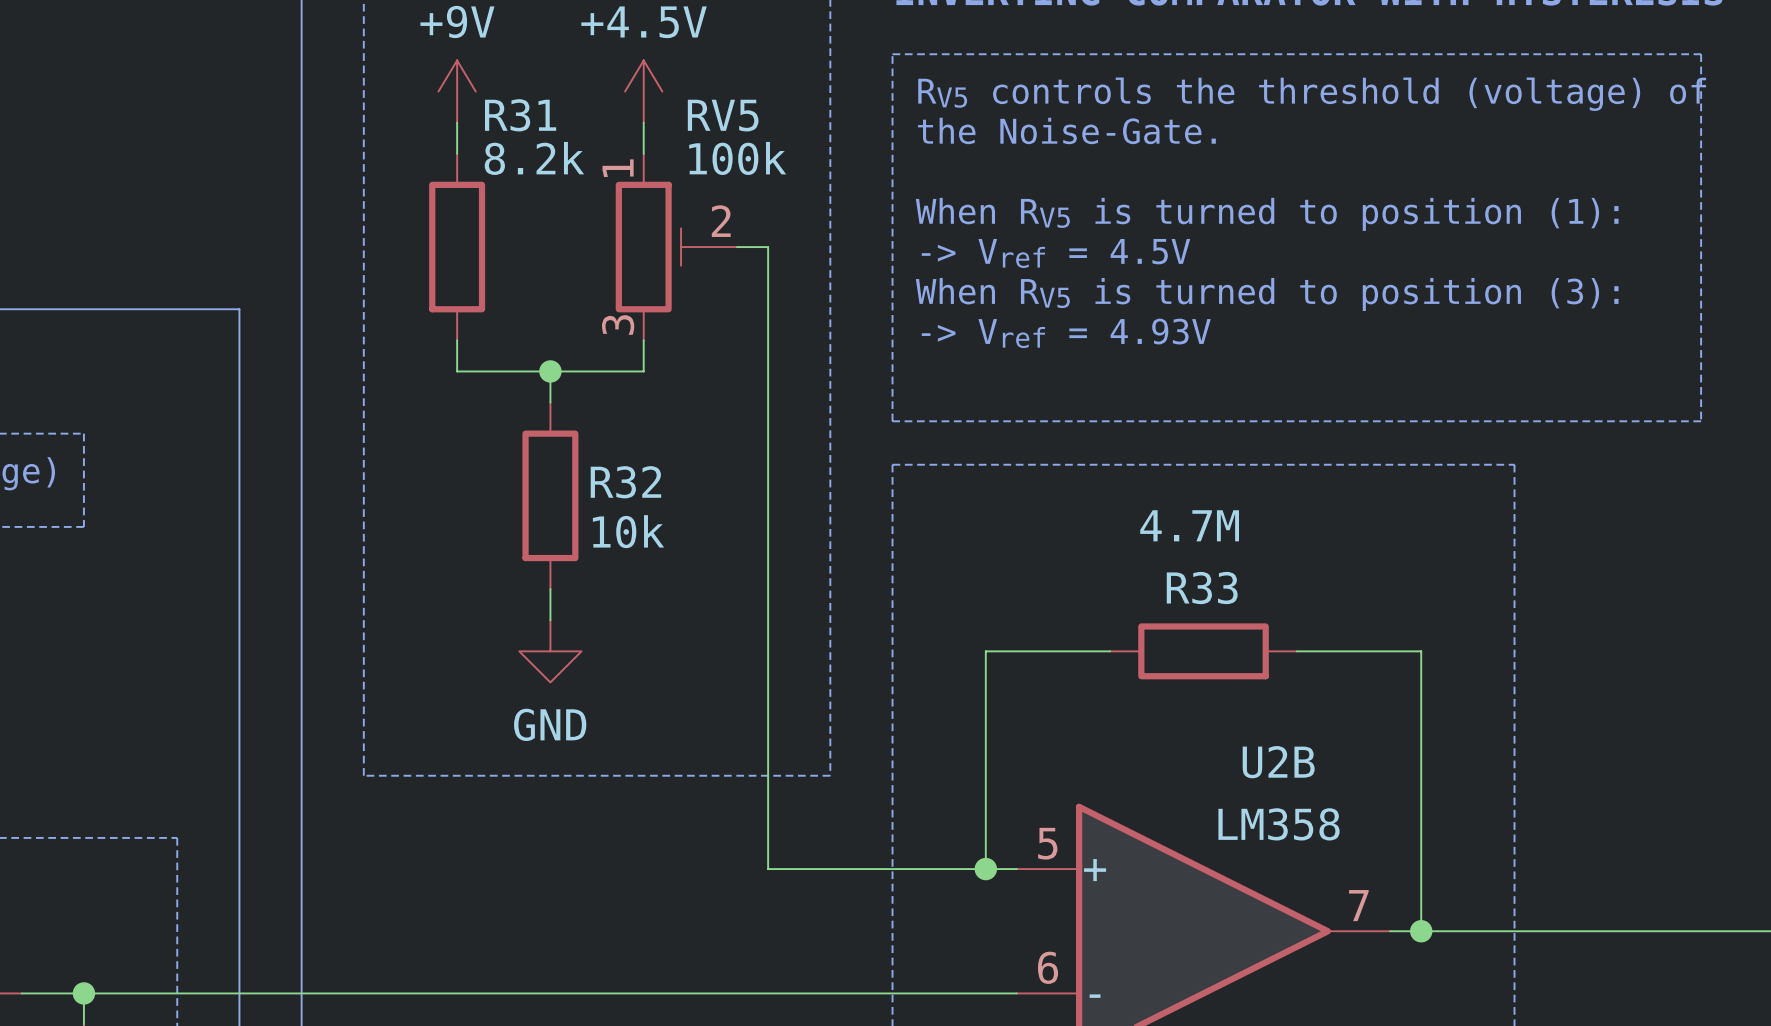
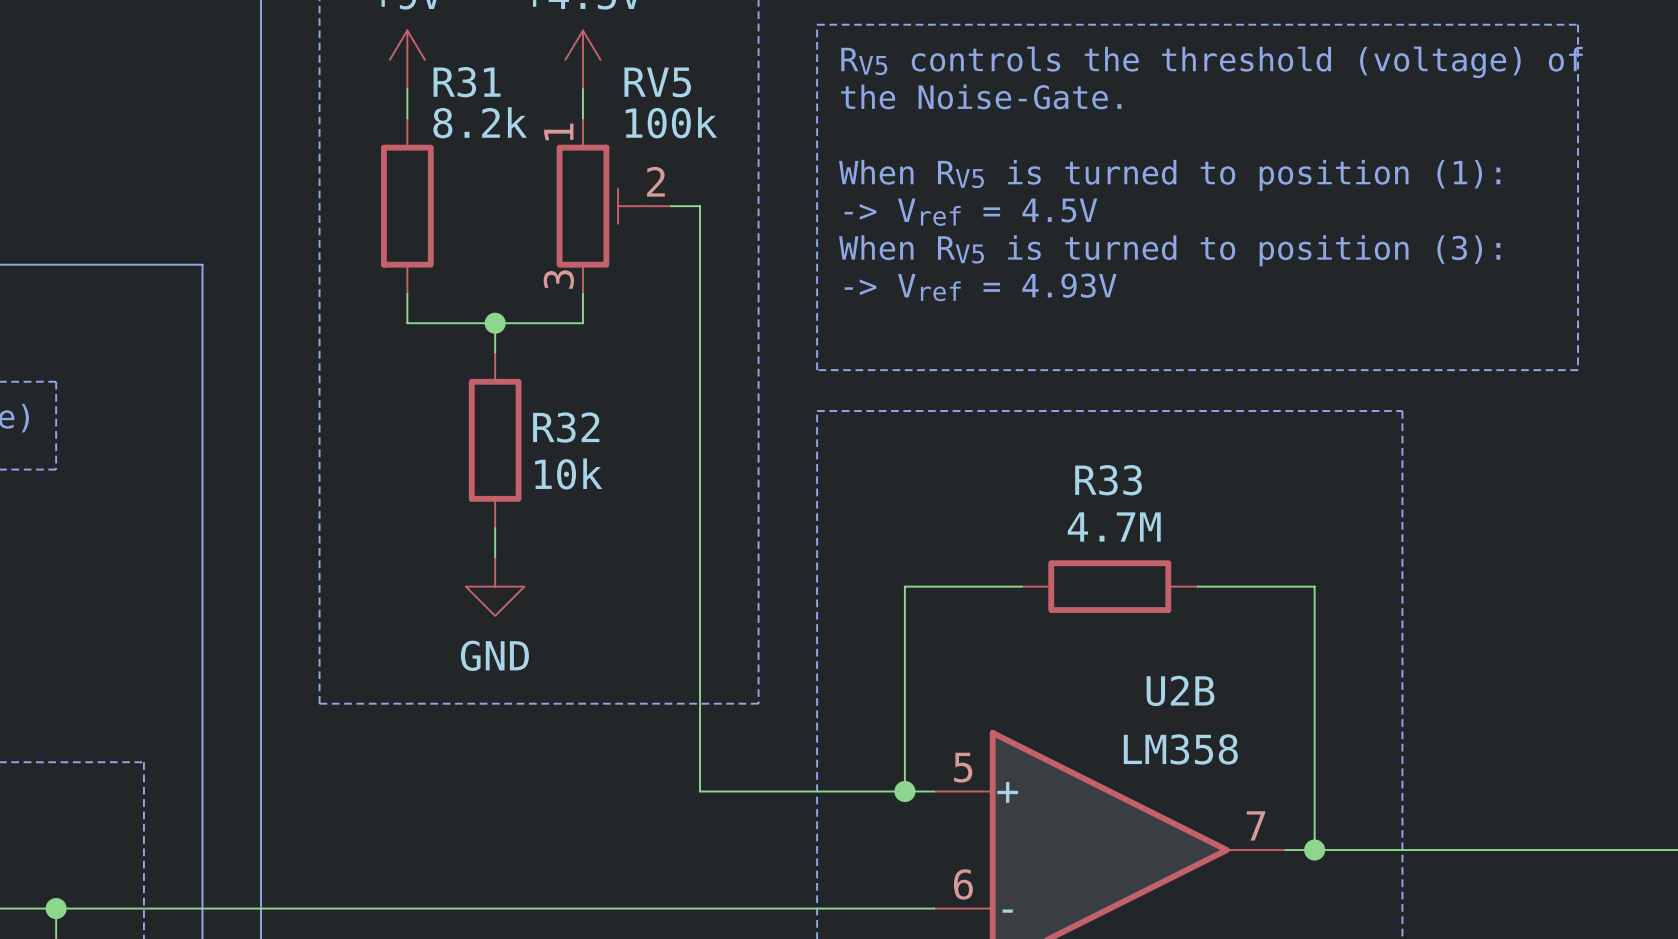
R33 value position: 4.7M (1189, 525) -> 4.7M (1114, 527)
R33 name position: R33 (1202, 588) -> R33 (1108, 480)

